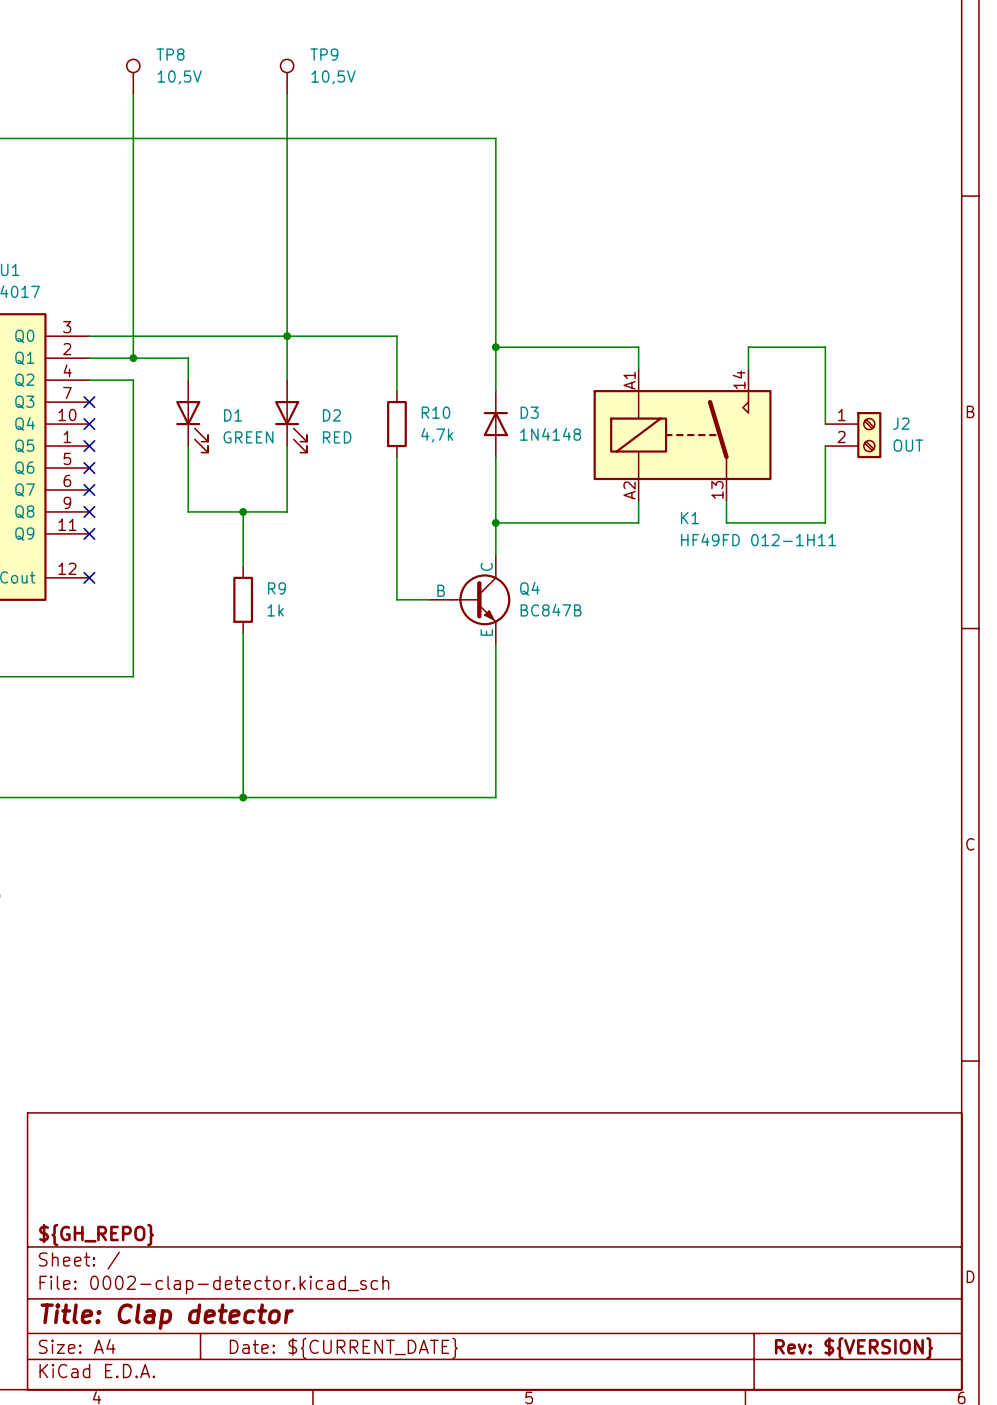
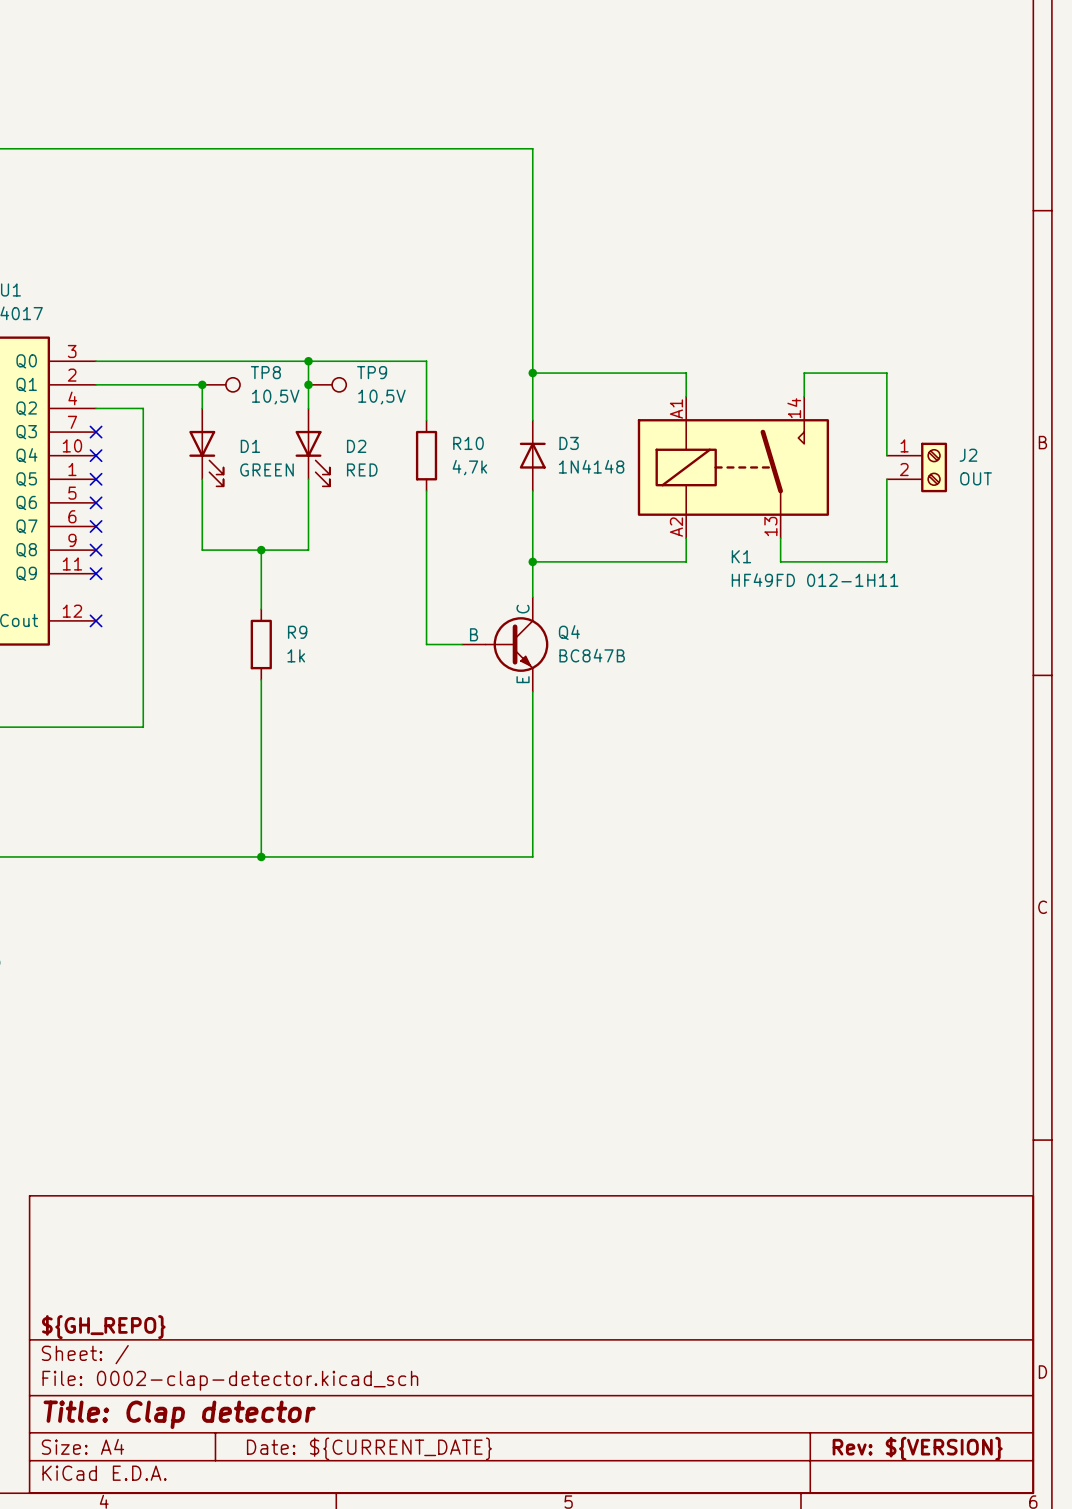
TP8 rotation: 0° (133, 65) -> 90° clockwise (232, 384)
TP9 rotation: 0° (287, 65) -> 90° clockwise (339, 384)
TP8 position: (133, 76) -> (221, 384)
TP9 position: (287, 76) -> (327, 384)
wire: (133, 94) (133, 358) -> none
wire: (287, 94) (287, 336) -> none
junction: (133, 358) -> none
junction: none -> (202, 384)
junction: none -> (308, 384)

